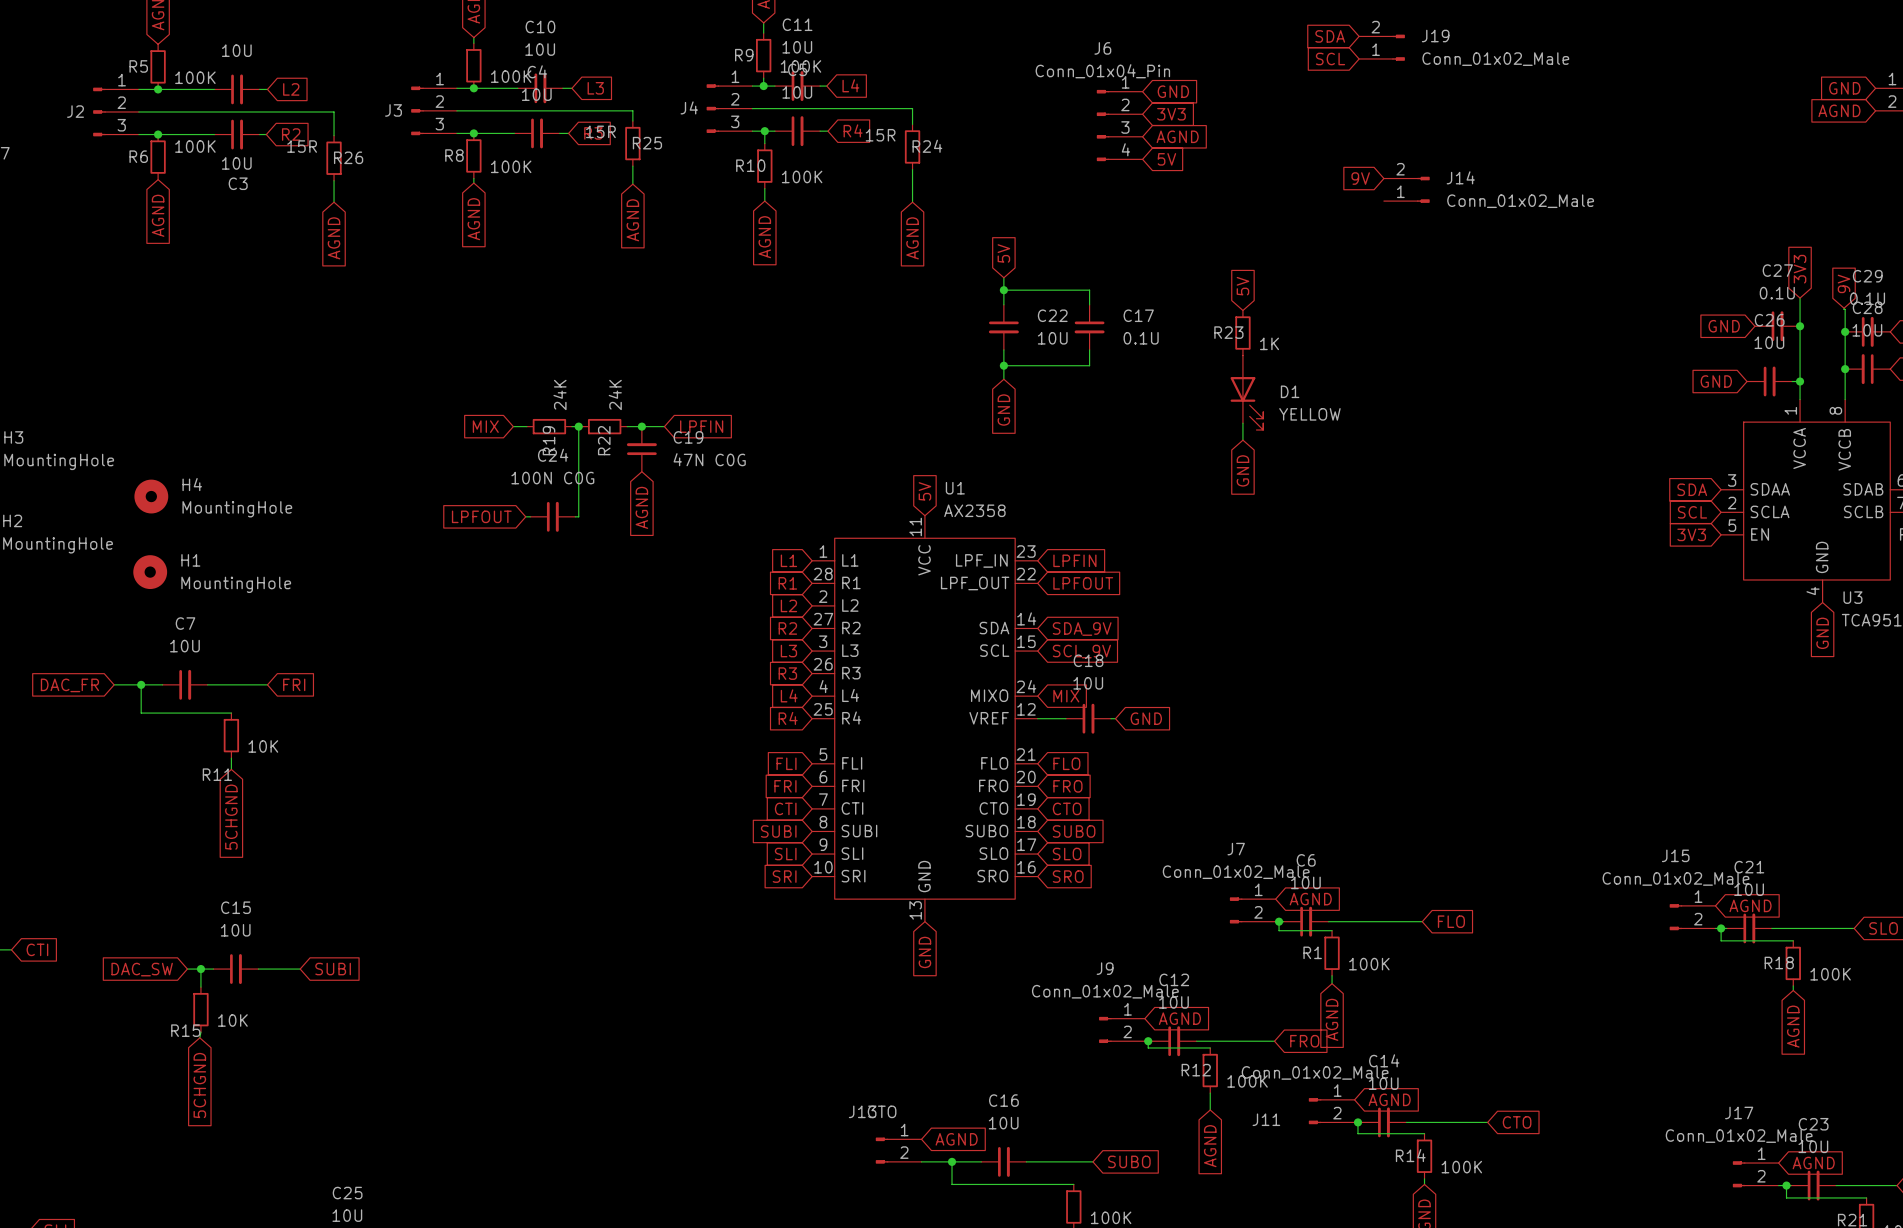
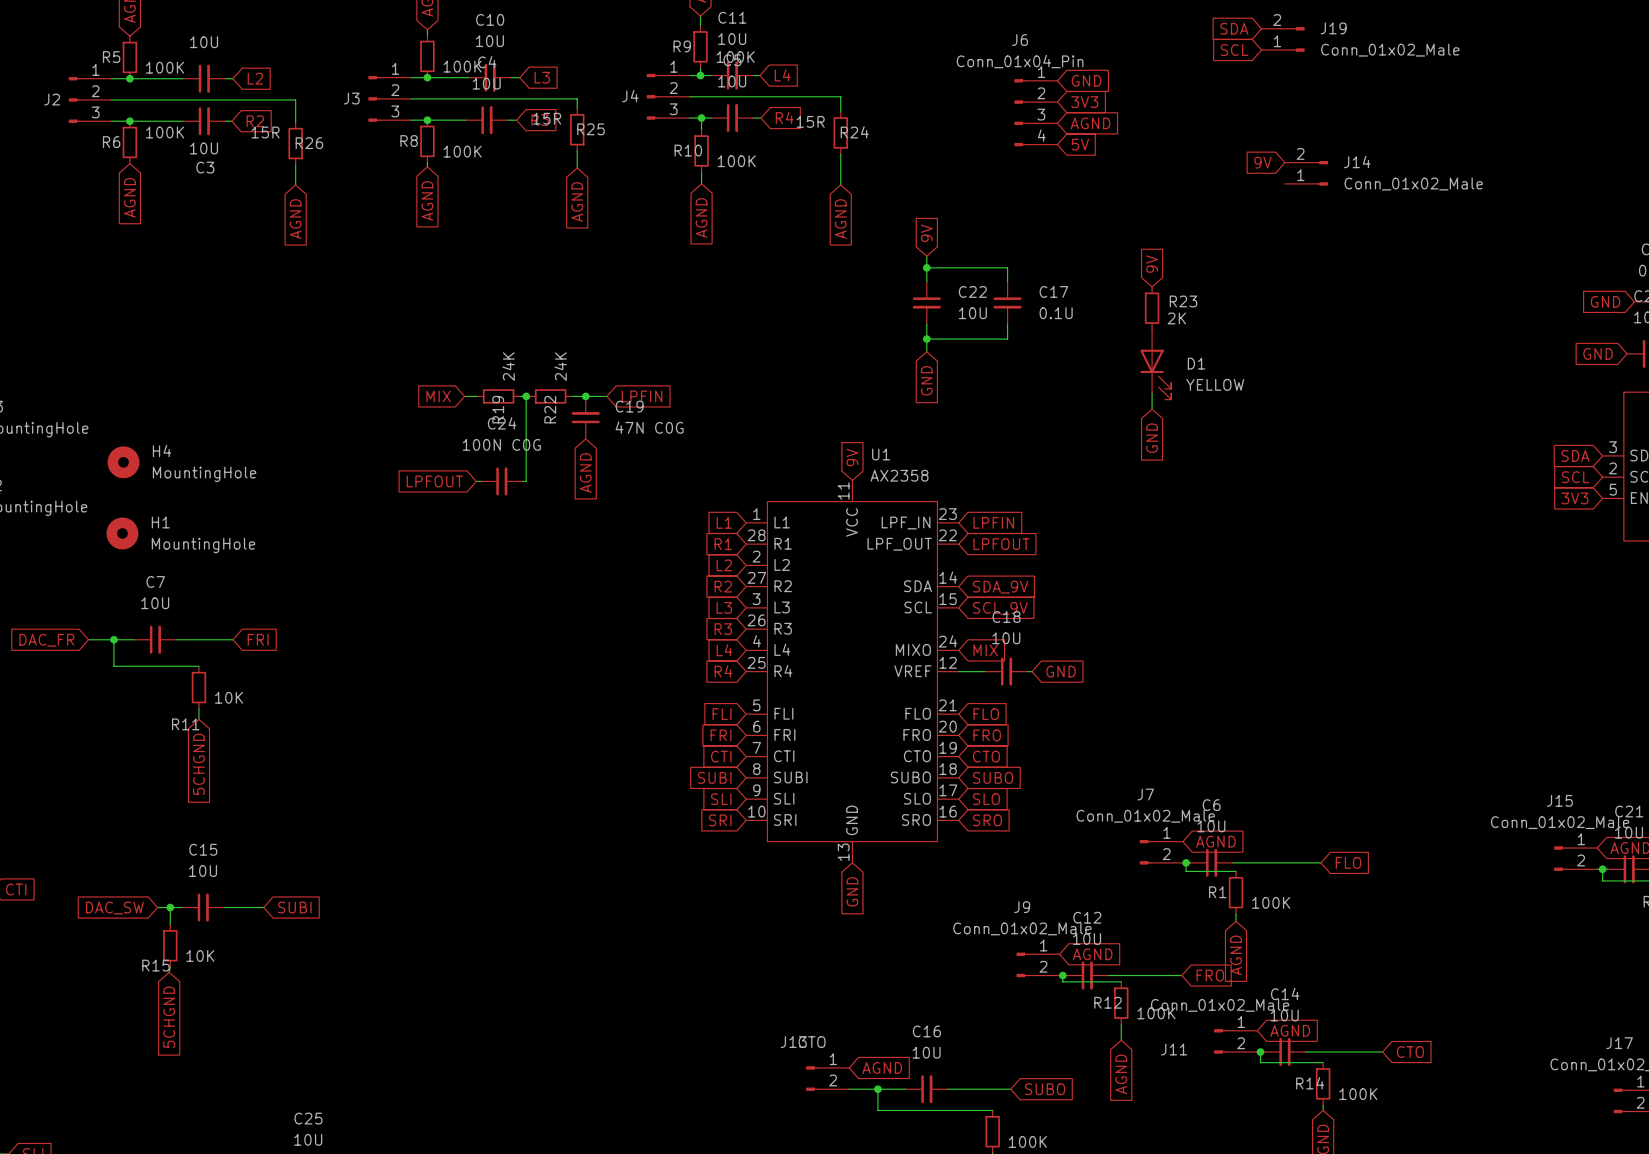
global label: 5V (1003, 253) -> 9V (926, 233)
global label: 5V (1242, 286) -> 9V (1152, 264)
R23 name position: R23 (1228, 332) -> R23 (1183, 301)
R23 value: 1K (1269, 343) -> 2K (1176, 318)
global label: 5V (924, 491) -> 9V (852, 457)

